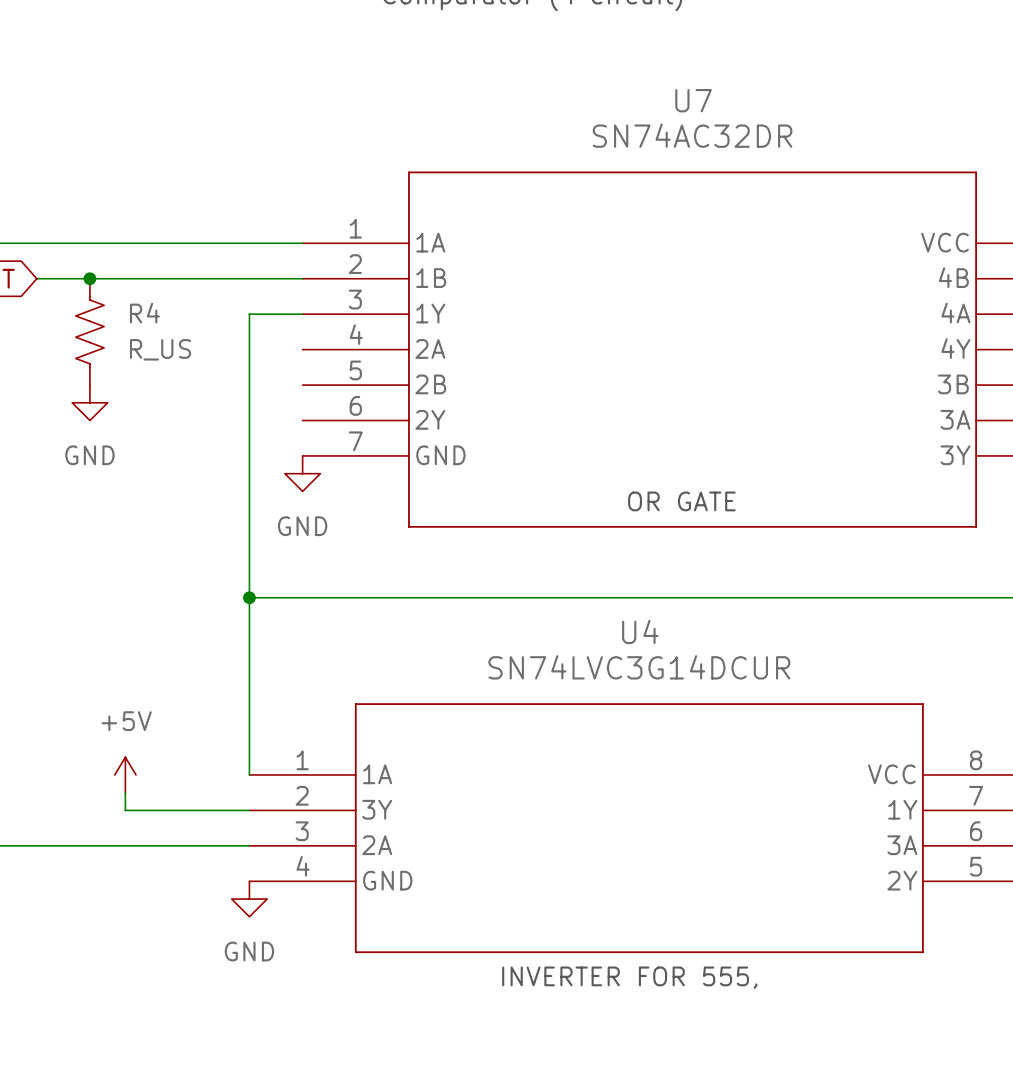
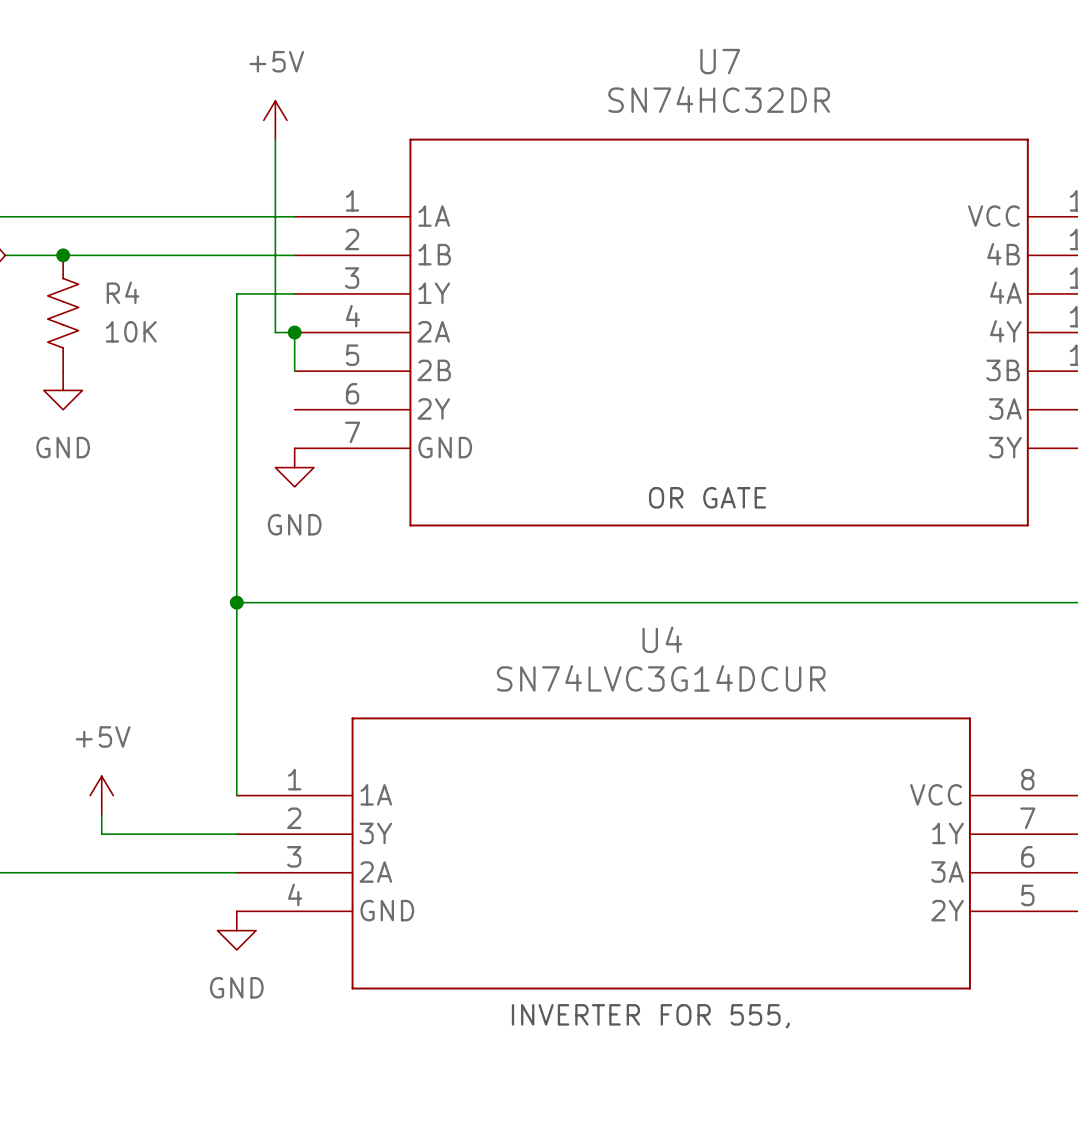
U7 value: SN74AC32DR (692, 135) -> SN74HC32DR (719, 99)
power symbol: none -> +5V (275, 120)
wire: none -> (275, 139) (275, 332) (294, 332) (294, 371)
R4 value: R_US (160, 349) -> 10K (131, 331)
junction: none -> (294, 332)

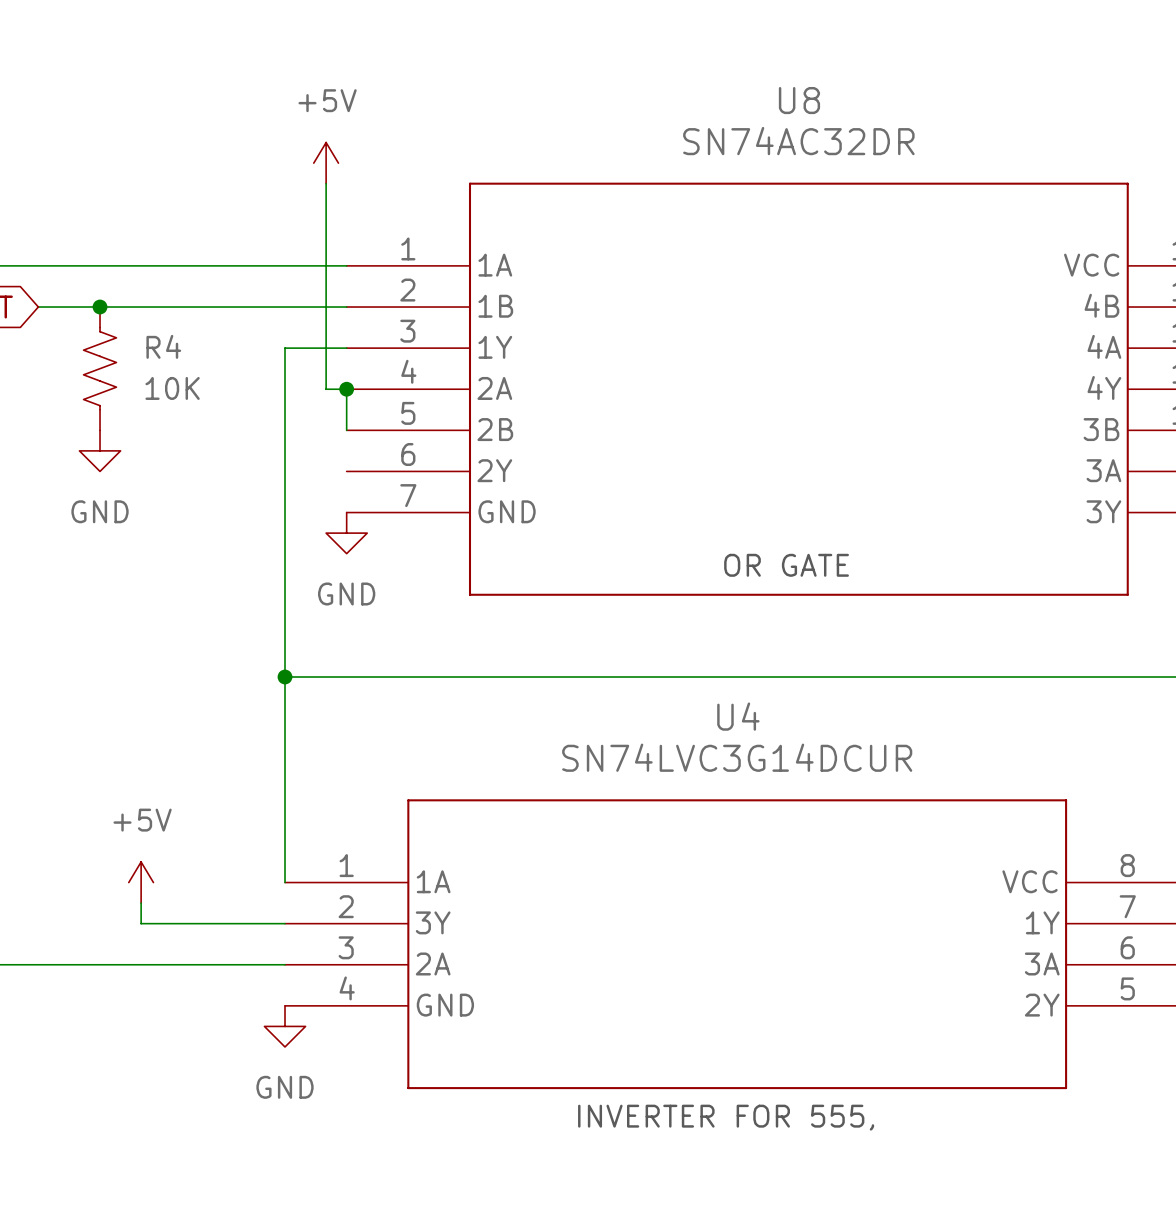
U7 name: U7 (720, 61) -> U8 (799, 100)
U7 value: SN74HC32DR (719, 99) -> SN74AC32DR (798, 141)

